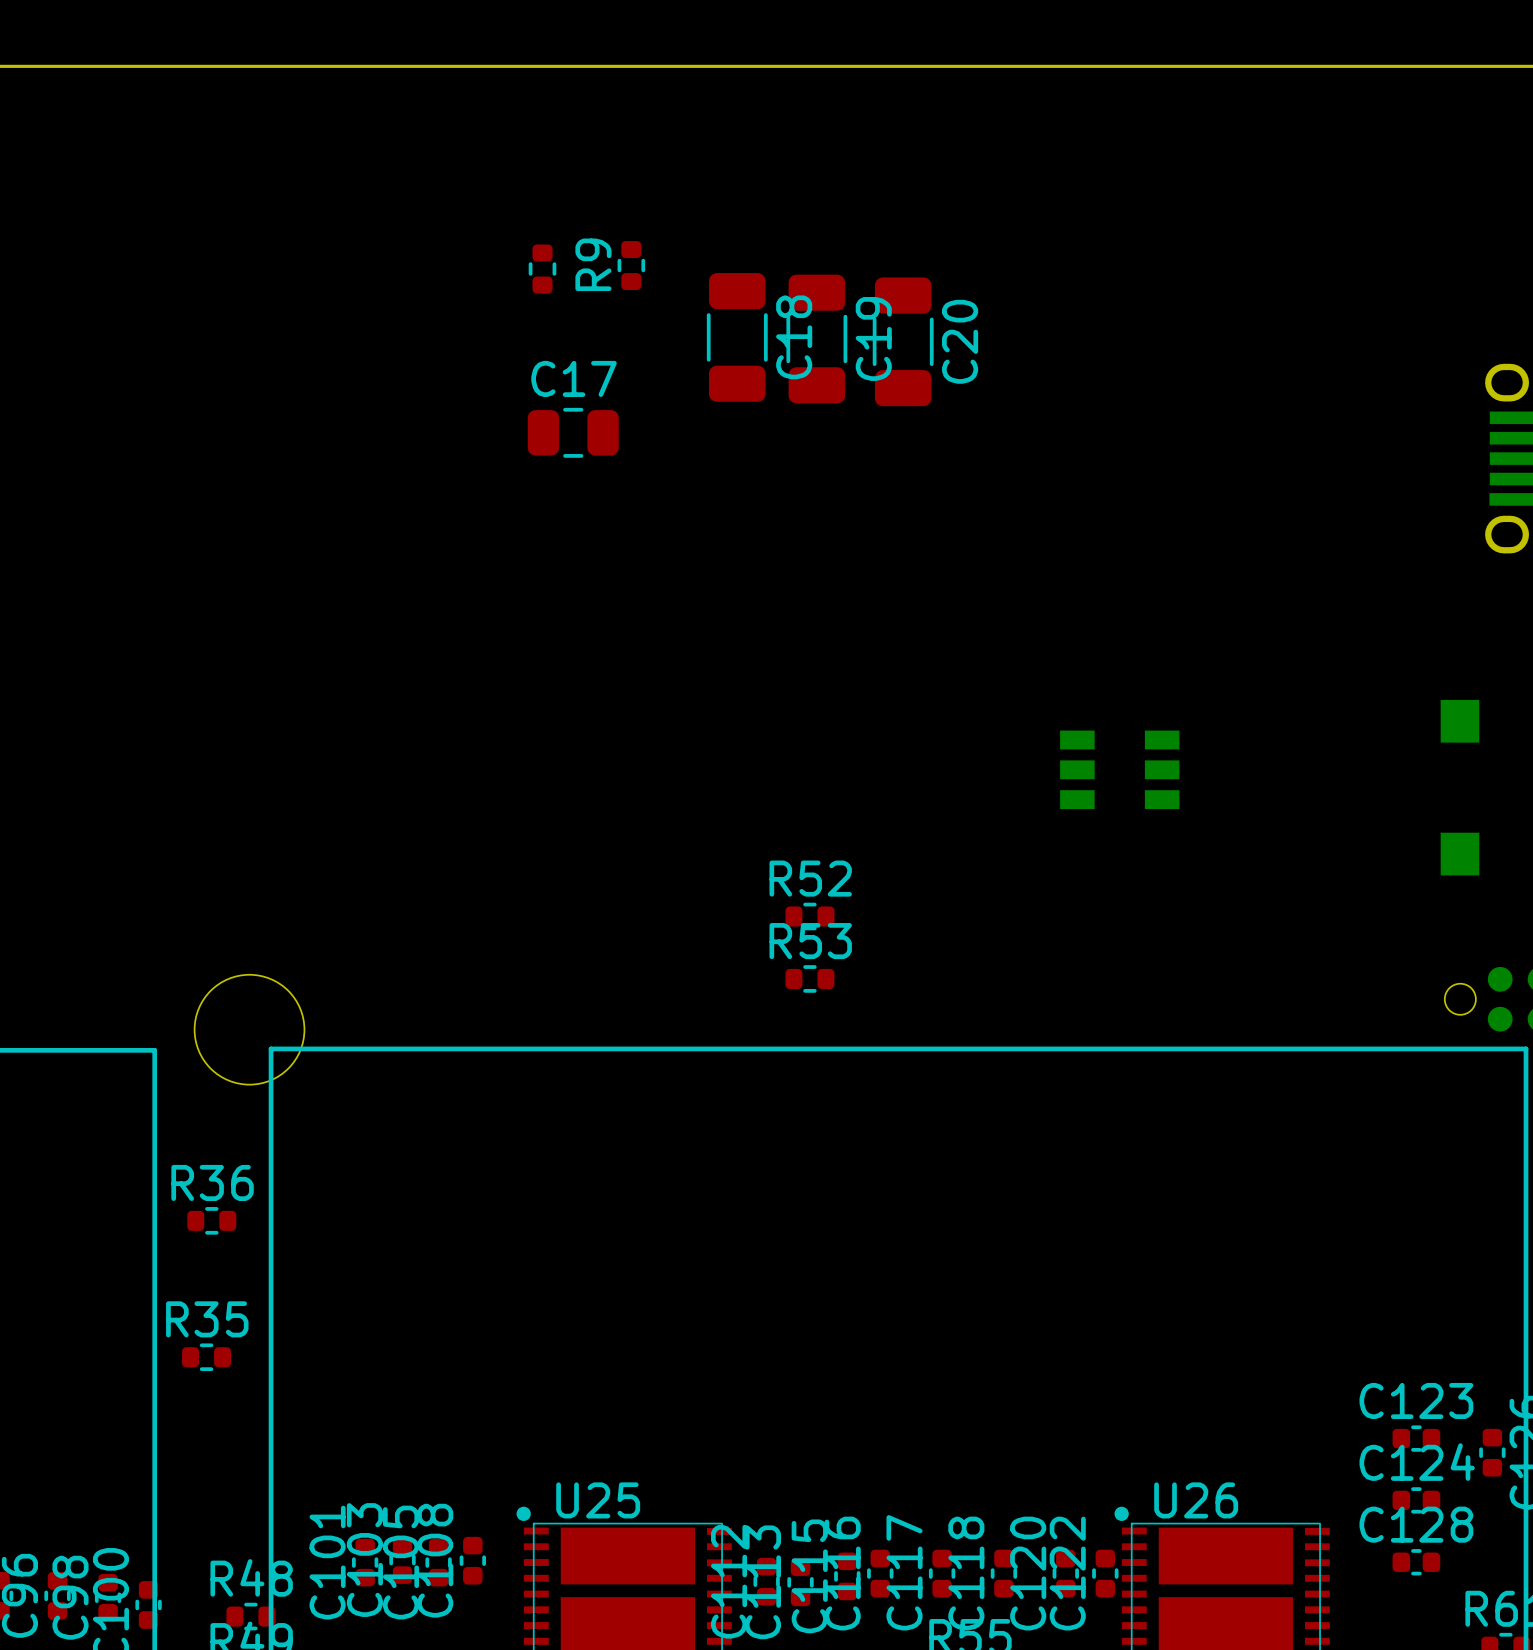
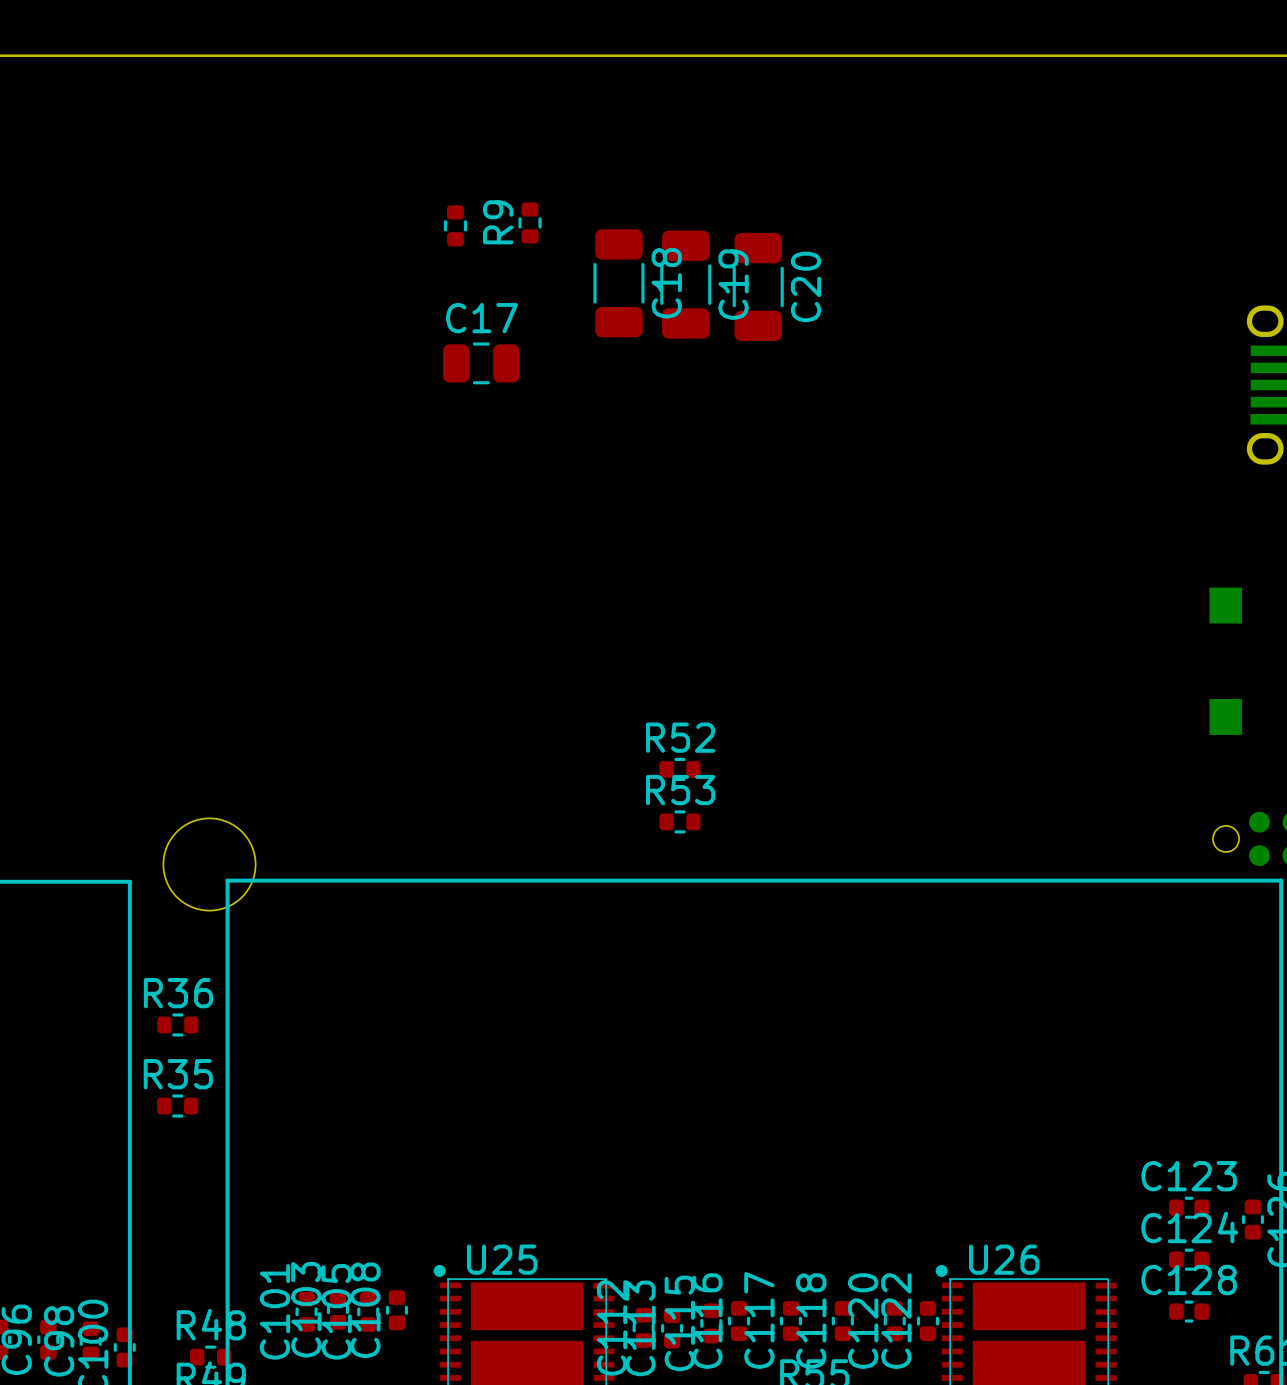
part: (1119, 769) -> none
R35 position: (206, 1357) -> (177, 1106)

